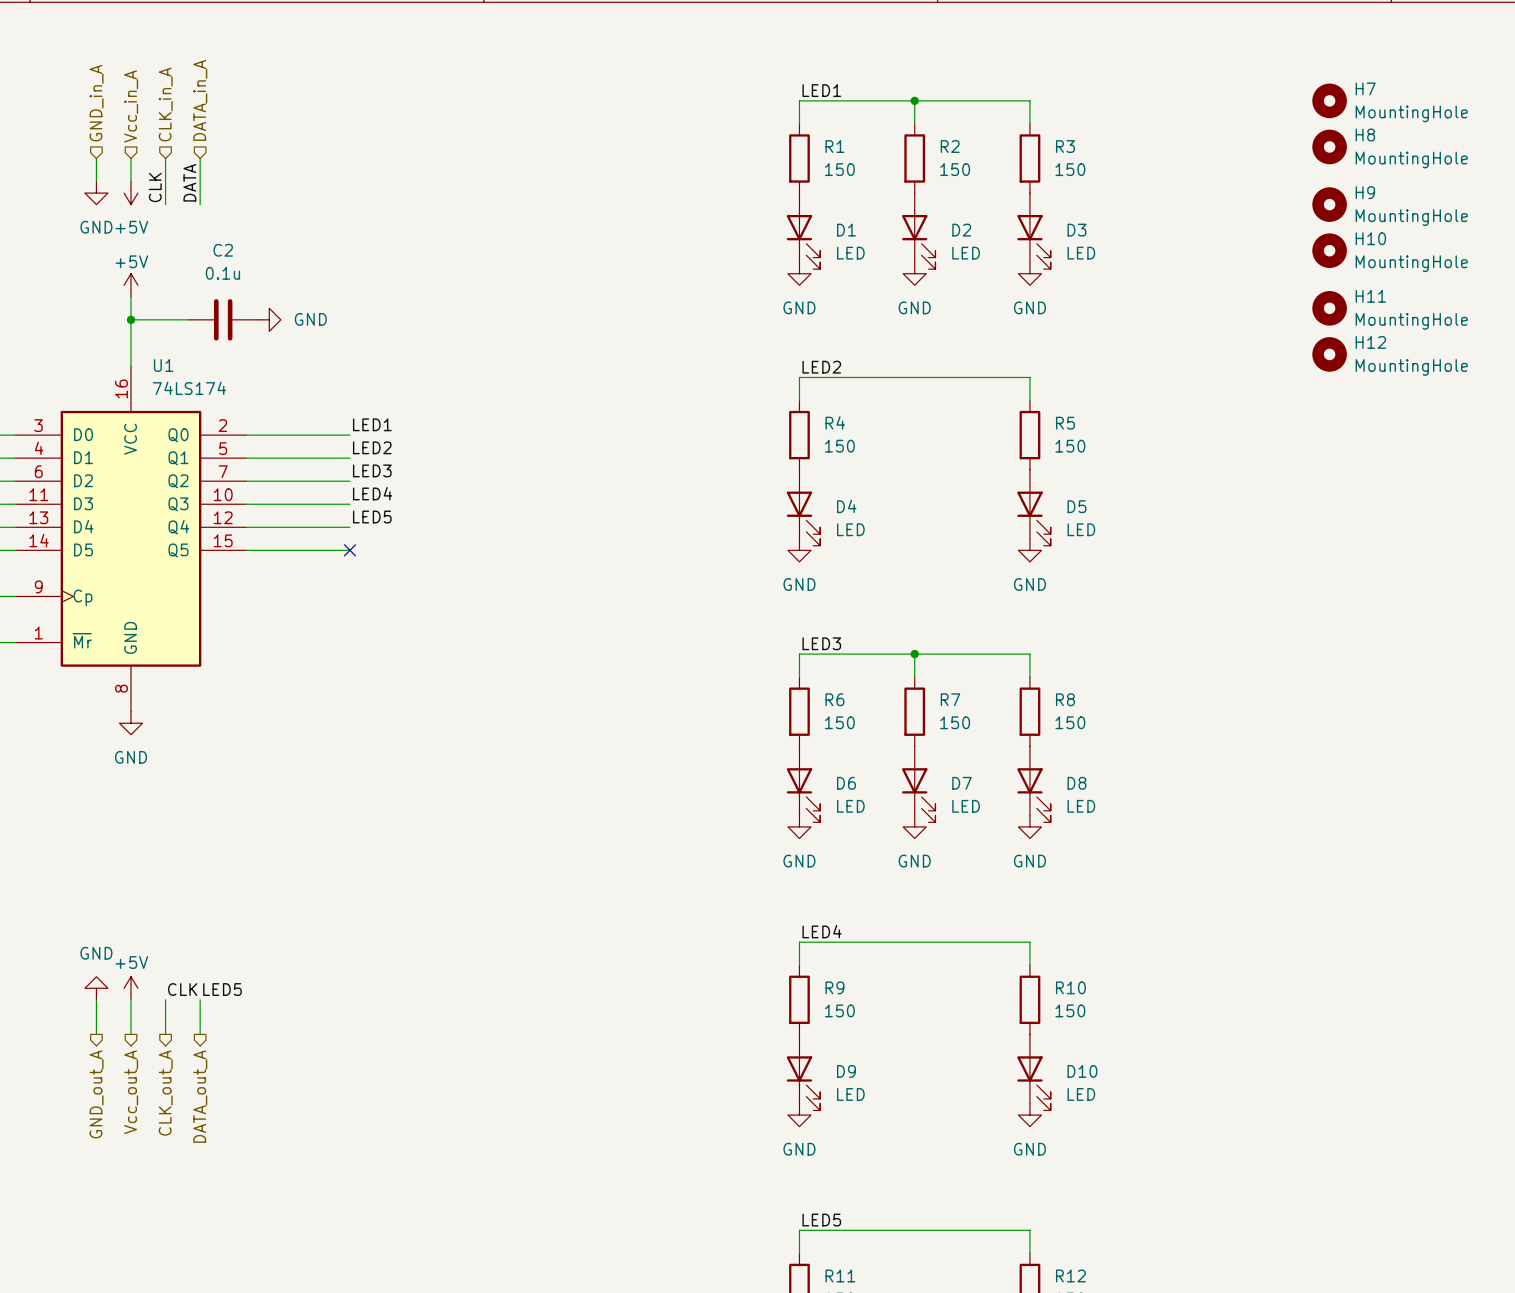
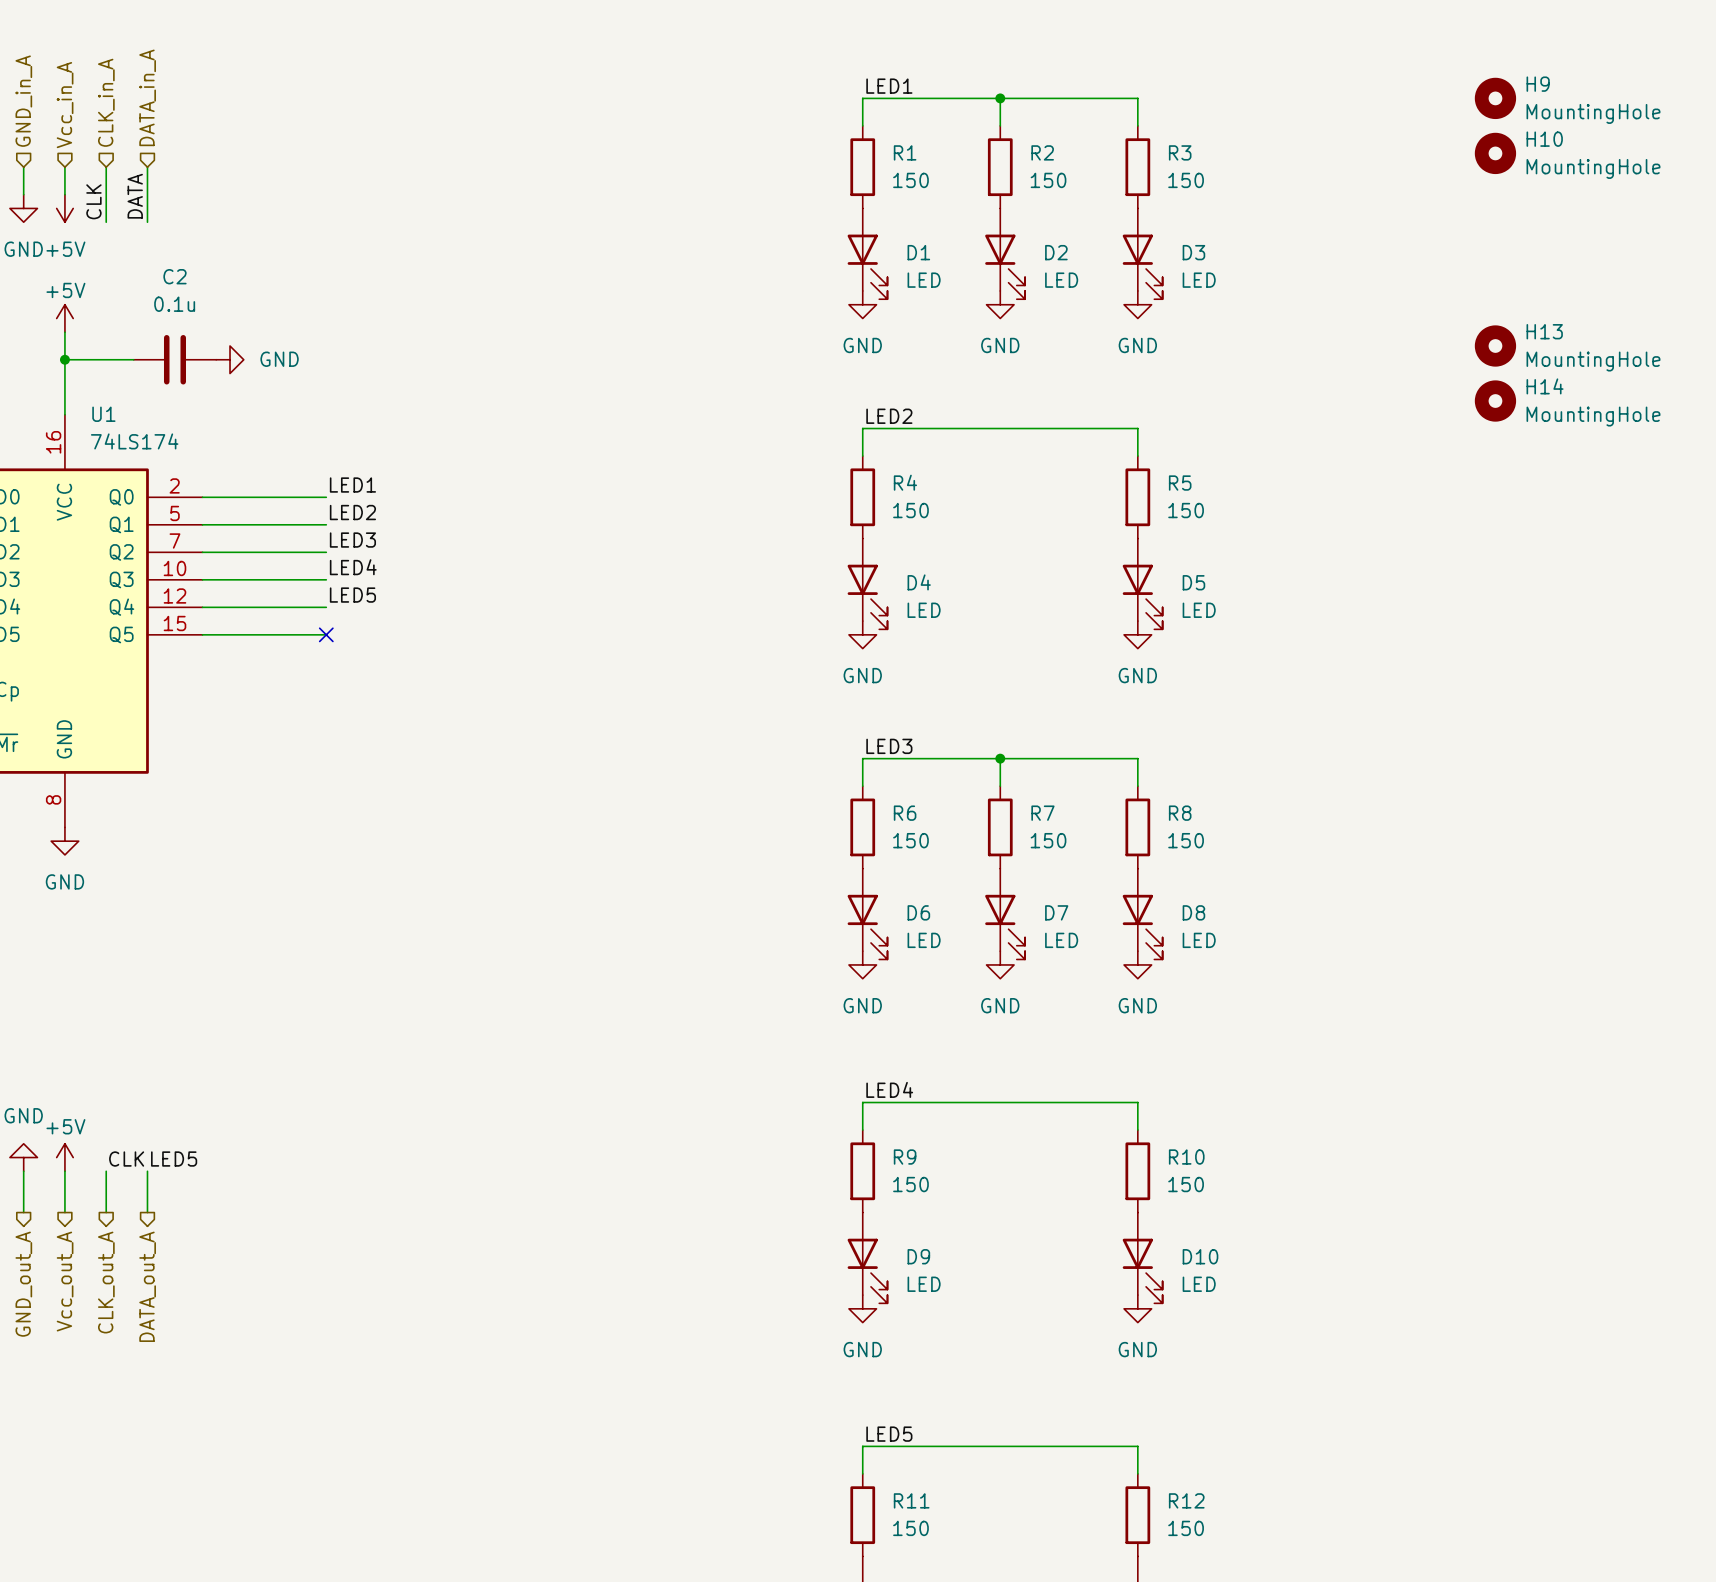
H7 name: H7 (1365, 88) -> H9 (1538, 84)
H8 name: H8 (1365, 135) -> H10 (1544, 139)
H9: MountingHole (1329, 204) -> none
H10: MountingHole (1329, 250) -> none
H11 name: H11 (1370, 296) -> H13 (1544, 331)
H12 name: H12 (1370, 342) -> H14 (1545, 386)

